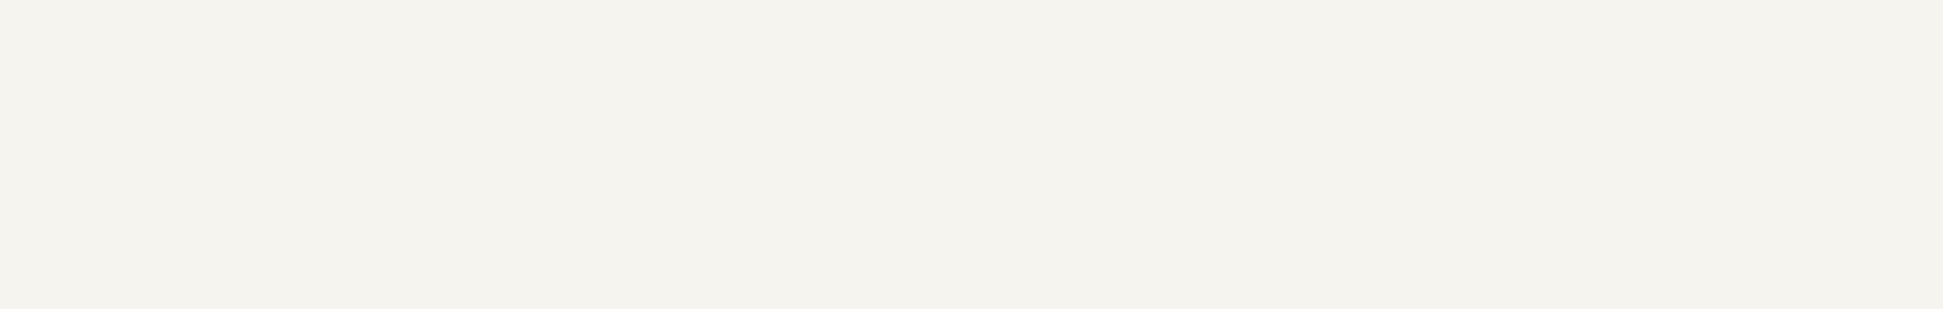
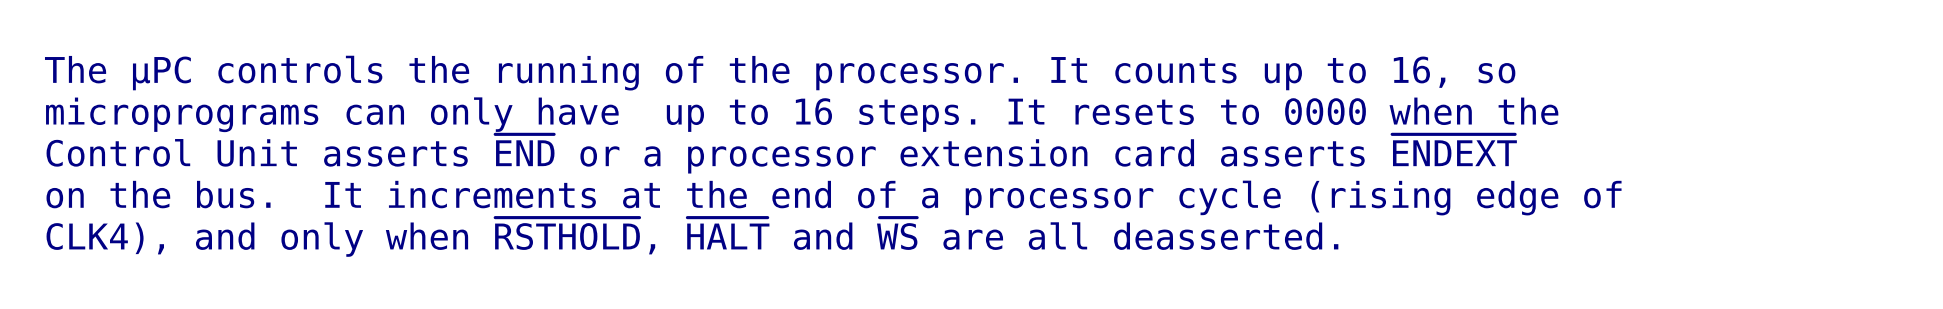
text: none -> The µPC controls the running of the processor. It counts up to 16, so (780, 73)
text: none -> microprograms can only have up to 16 steps. It resets to 0000 when the (802, 114)
text: none -> Control Unit asserts ~{END} or a processor extension card asserts ~{ENDEXT} (781, 153)
text: none -> on the bus. It increments at the end of a processor cycle (rising edge of (834, 198)
text: none -> CLK4), and only when ~{RSTHOLD}, ~{HALT} and ~{WS} are all deasserted. (692, 237)

